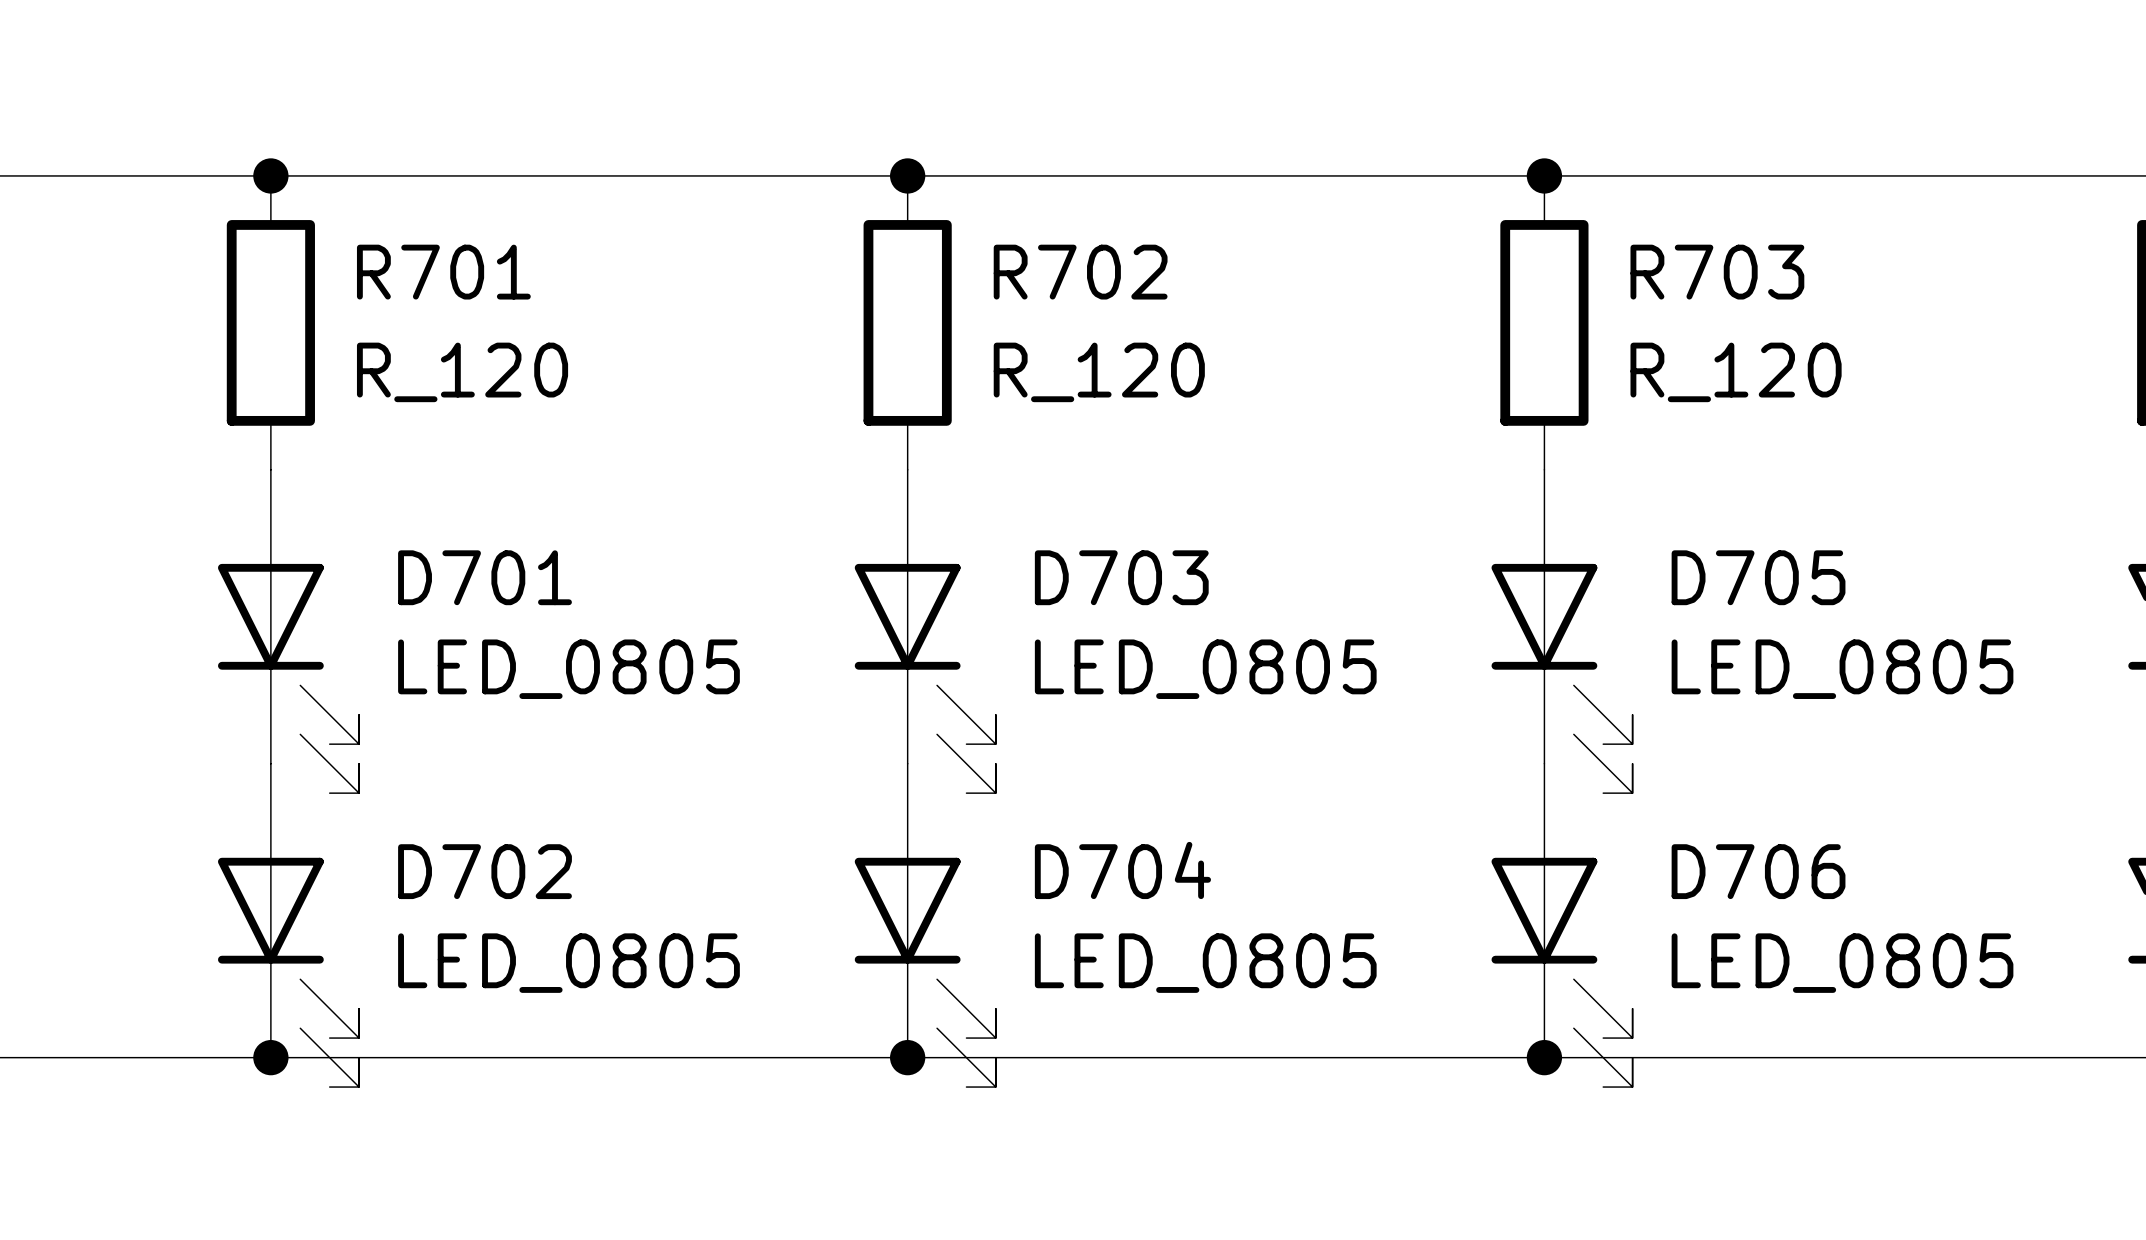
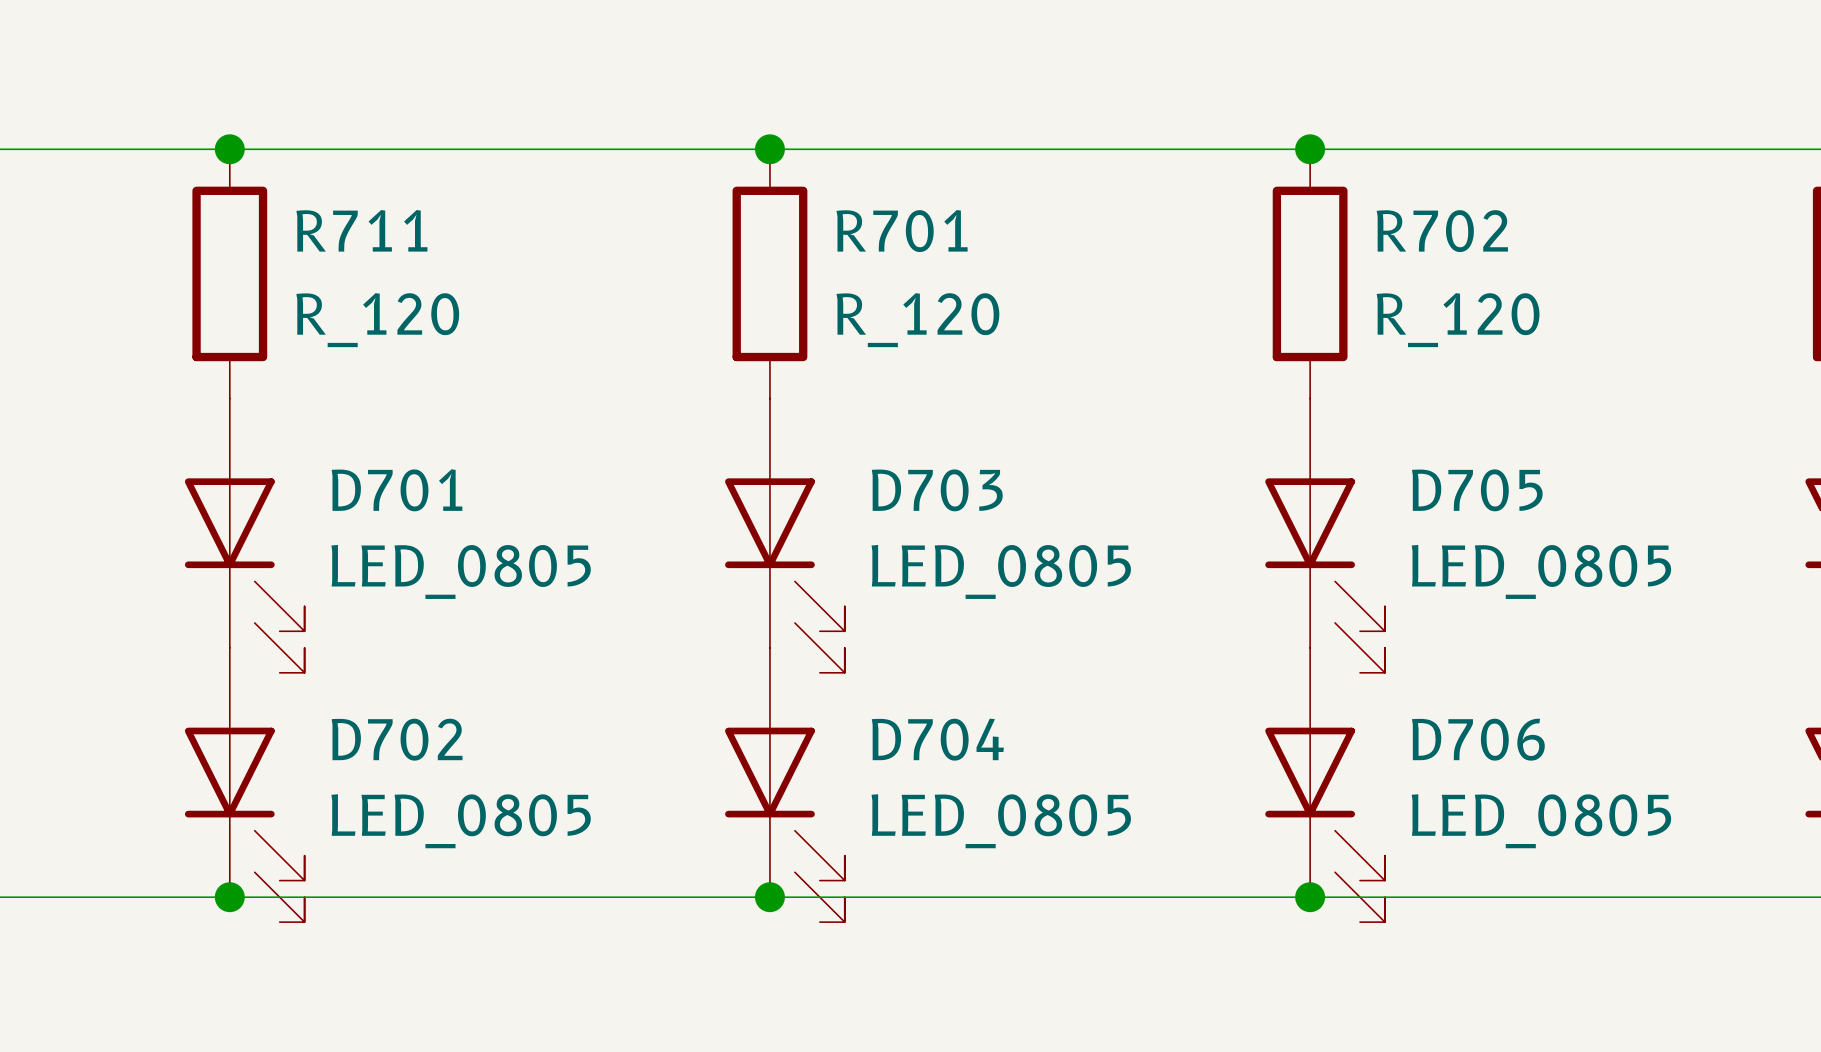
R701 name: R701 (443, 272) -> R711 (361, 230)
R702 name: R702 (1080, 272) -> R701 (902, 231)
R703 name: R703 (1717, 272) -> R702 (1442, 231)

